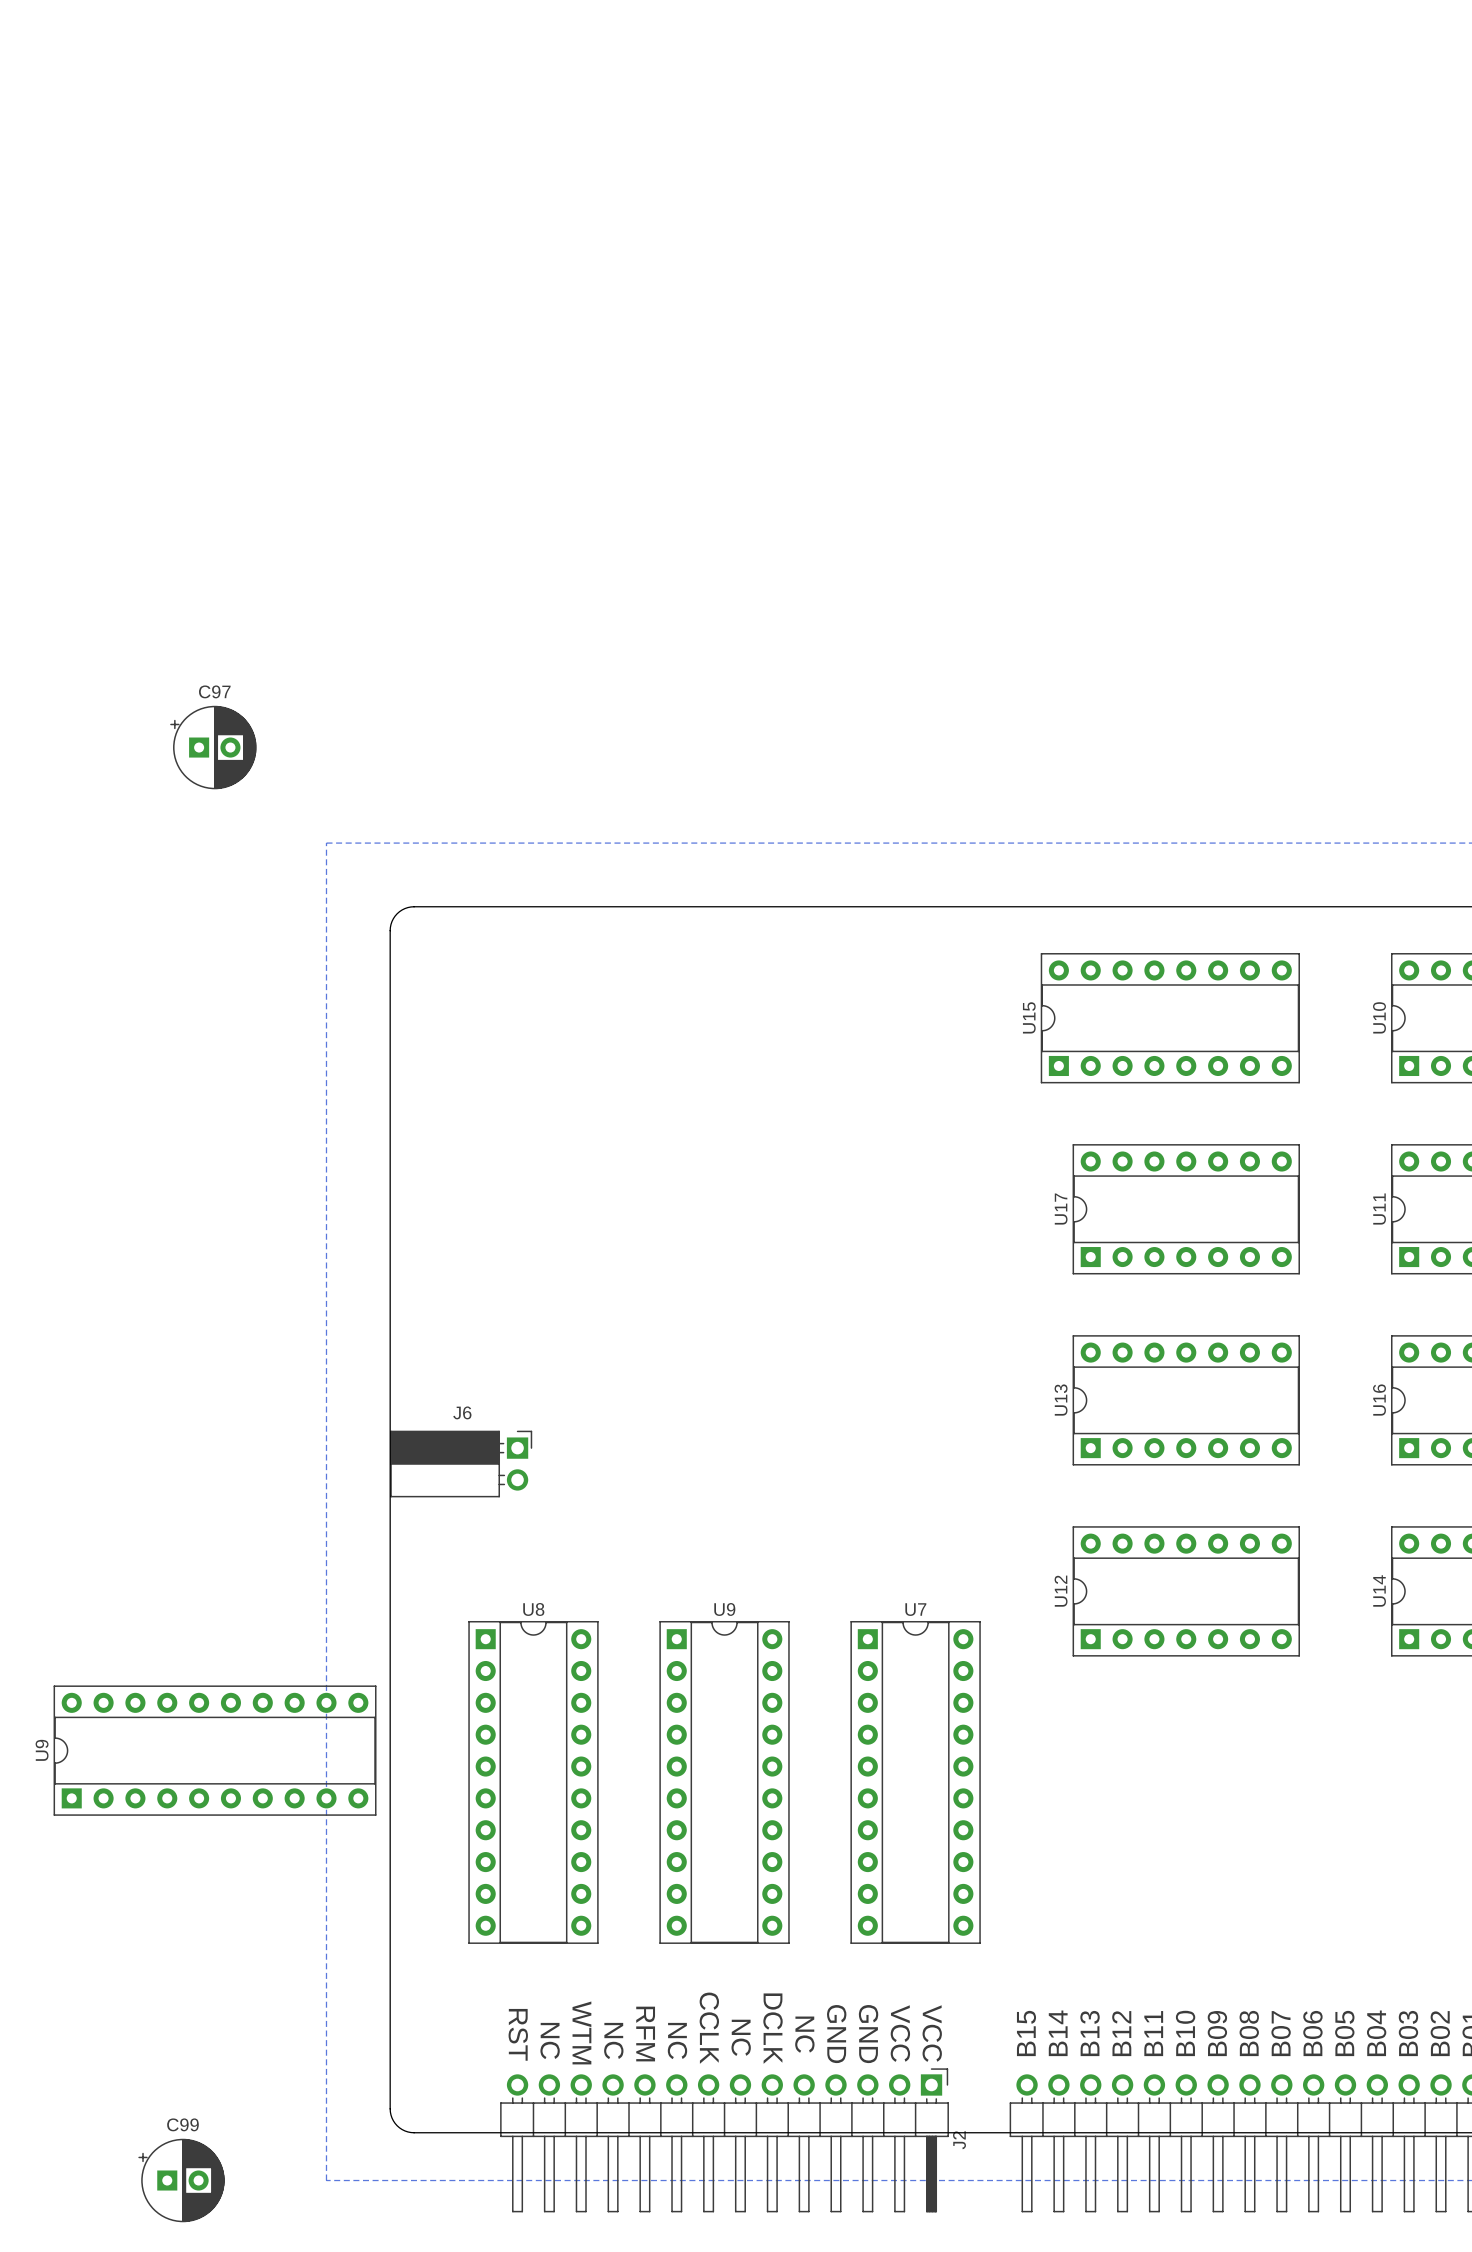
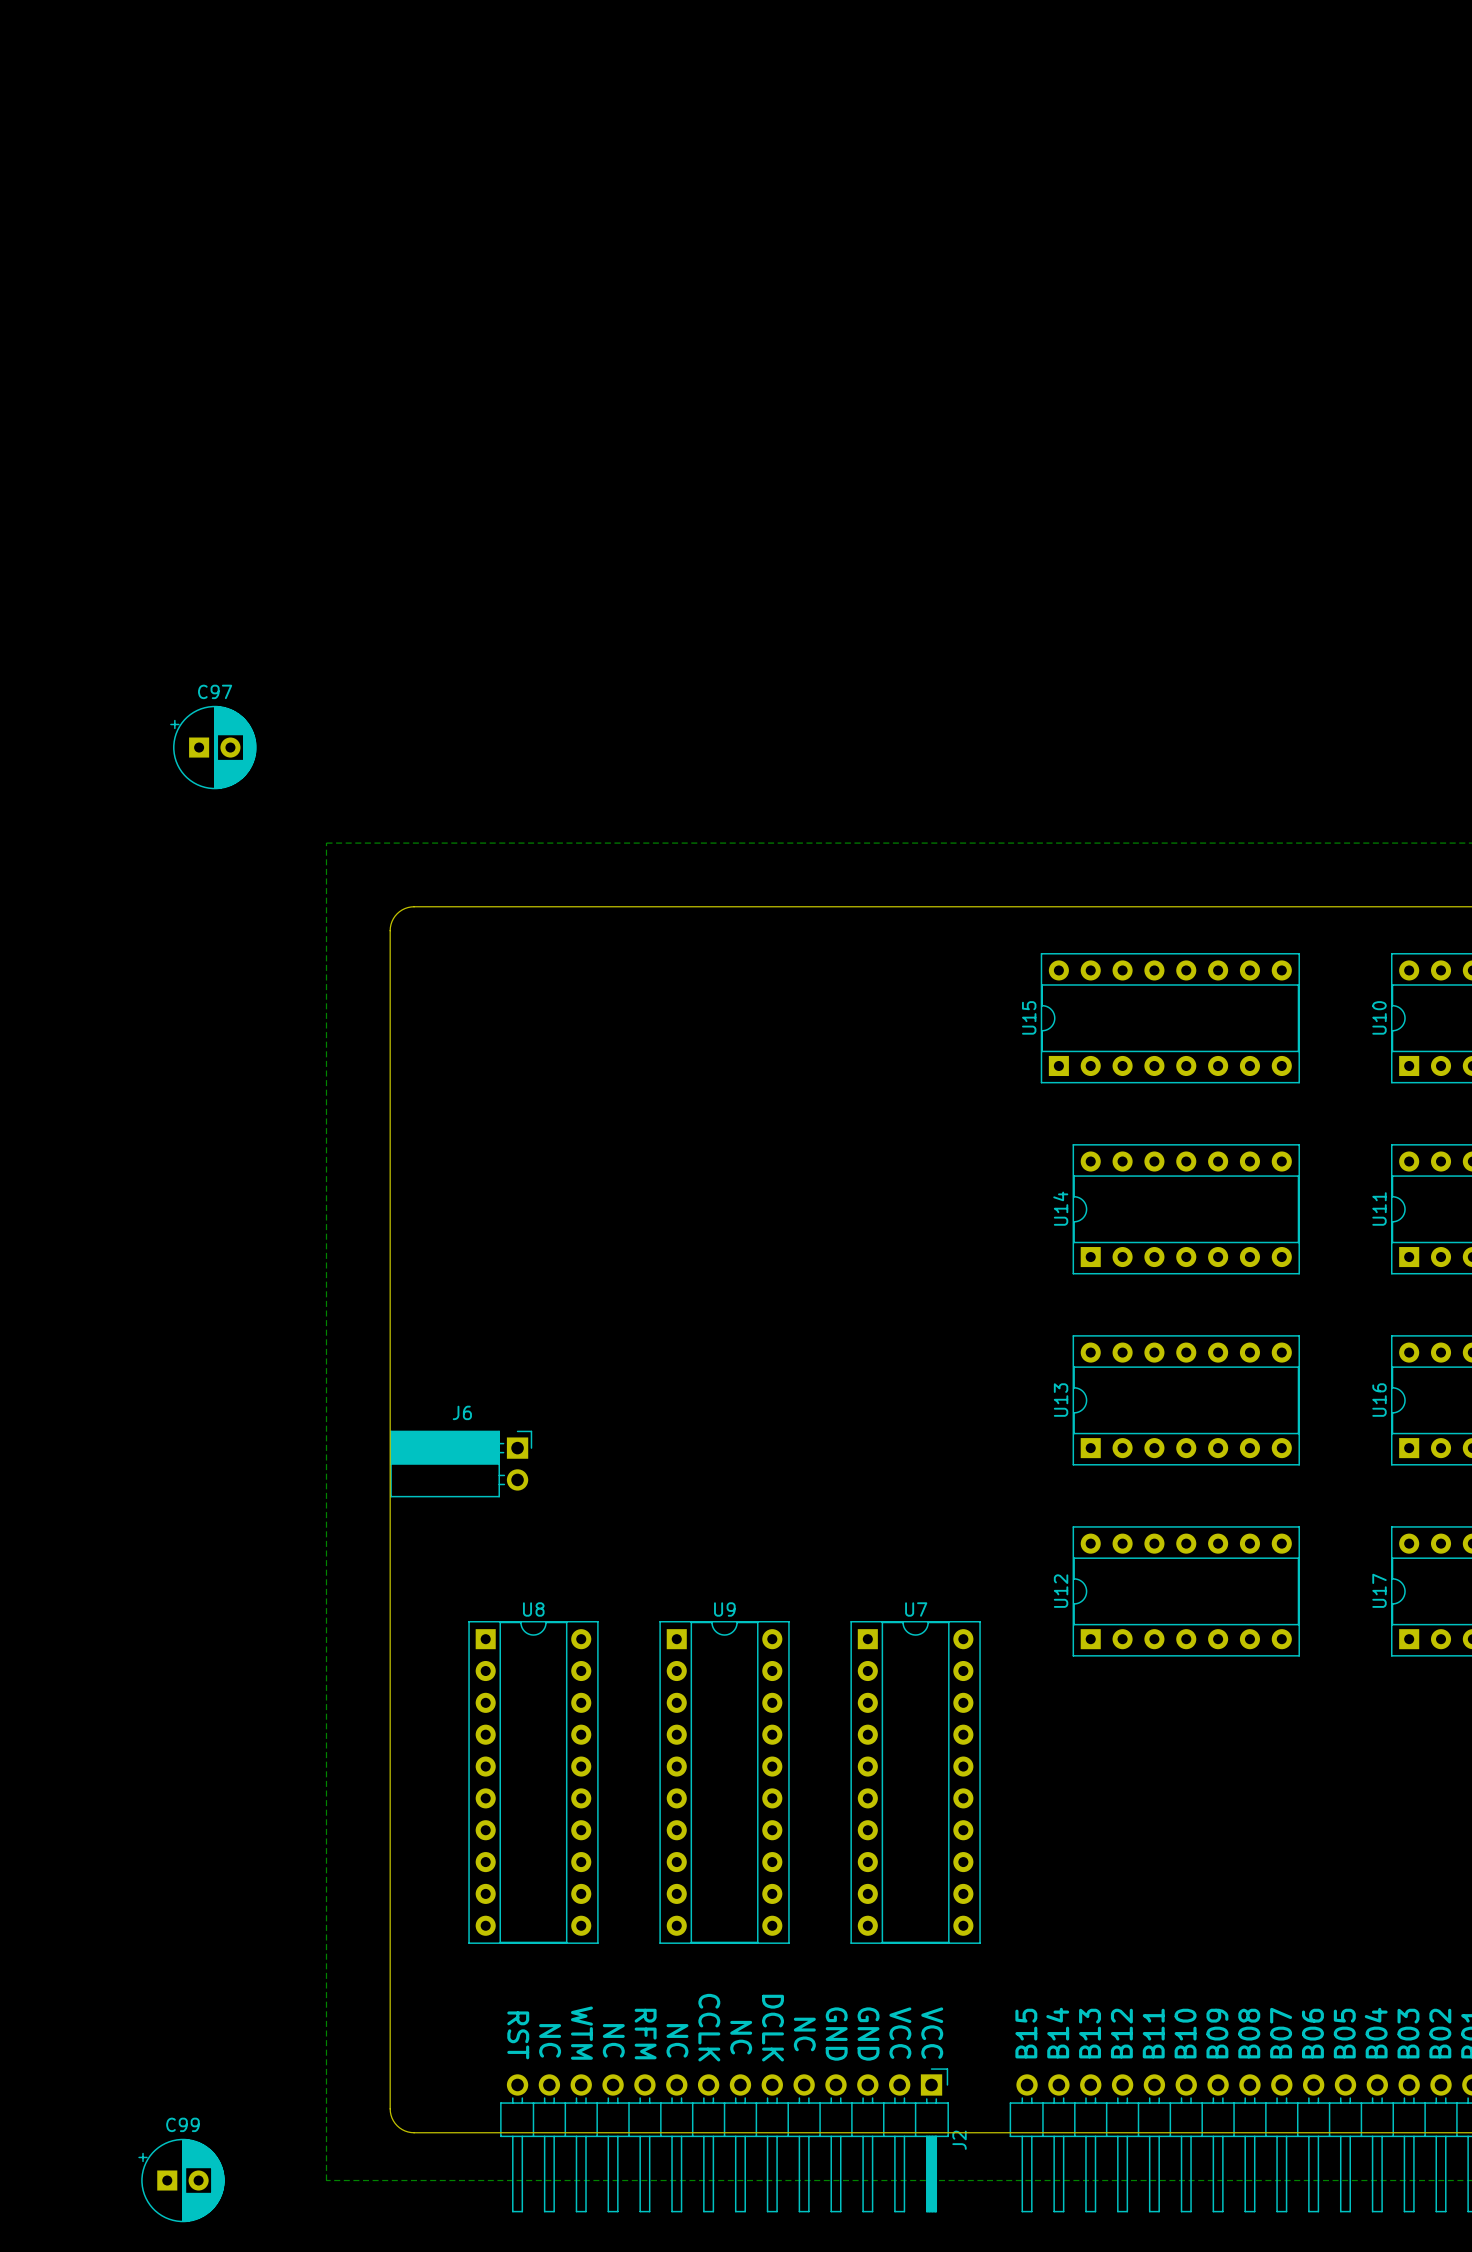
U17 name: U17 (1061, 1209) -> U14 (1060, 1208)
U14 name: U14 (1379, 1590) -> U17 (1379, 1590)
U9: (215, 1750) -> none

